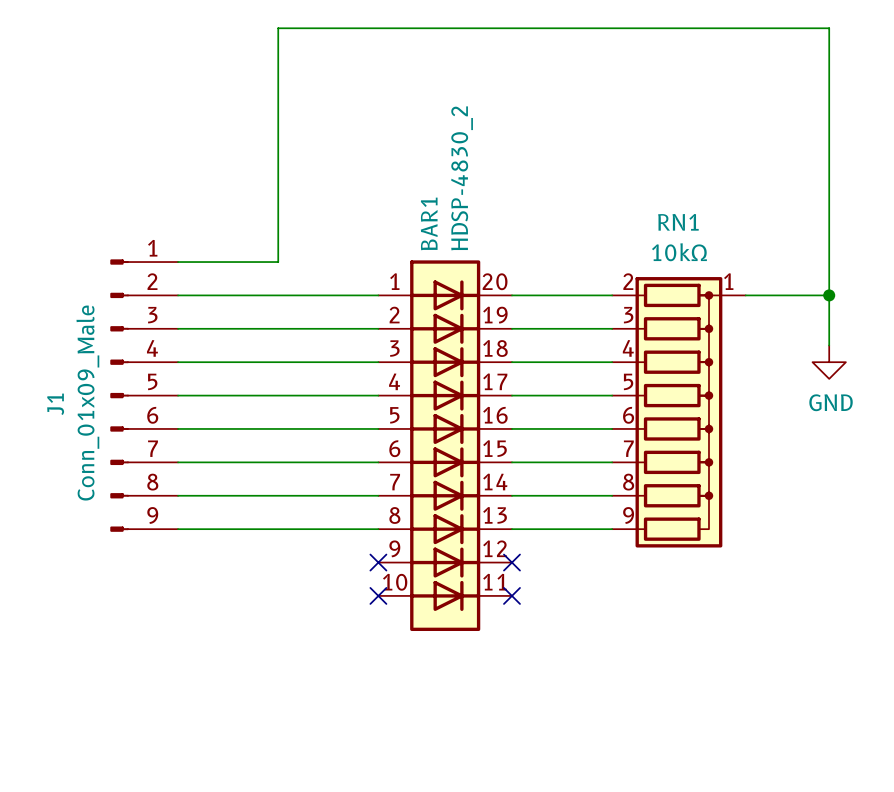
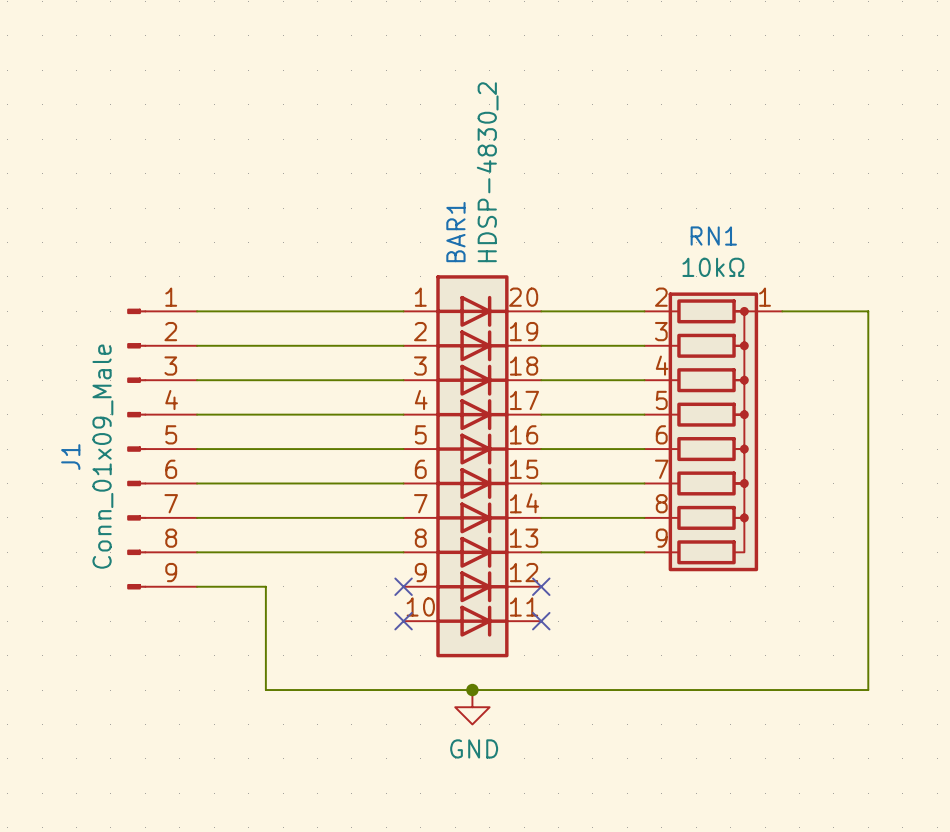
wire: (178, 262) (278, 262) (278, 28) (829, 28) (829, 295) -> none
junction: (829, 295) -> none
wire: none -> (868, 363) (868, 690) (265, 690) (265, 586) (197, 586)
power symbol: GND (829, 362) -> none
J1 position: (144, 395) -> (162, 449)
junction: none -> (472, 690)
power symbol: none -> GND (472, 707)

